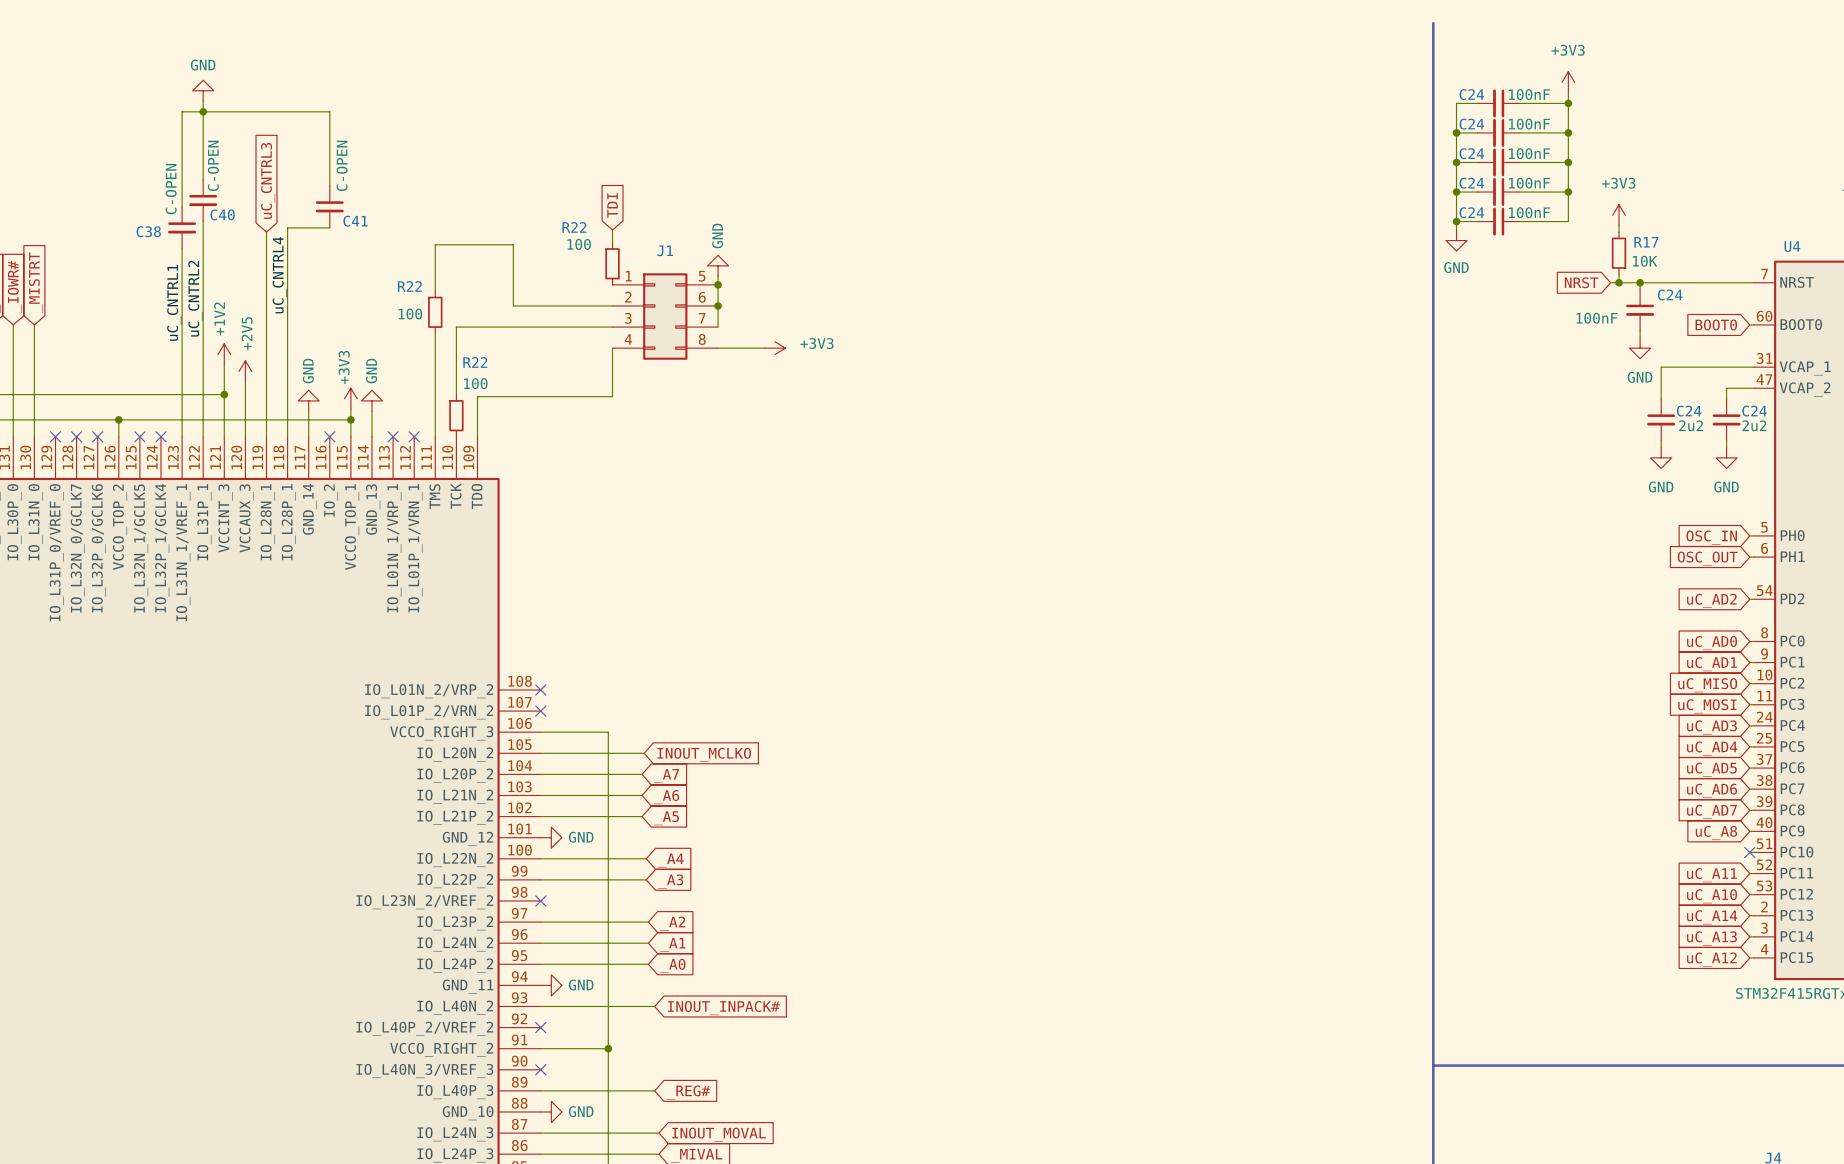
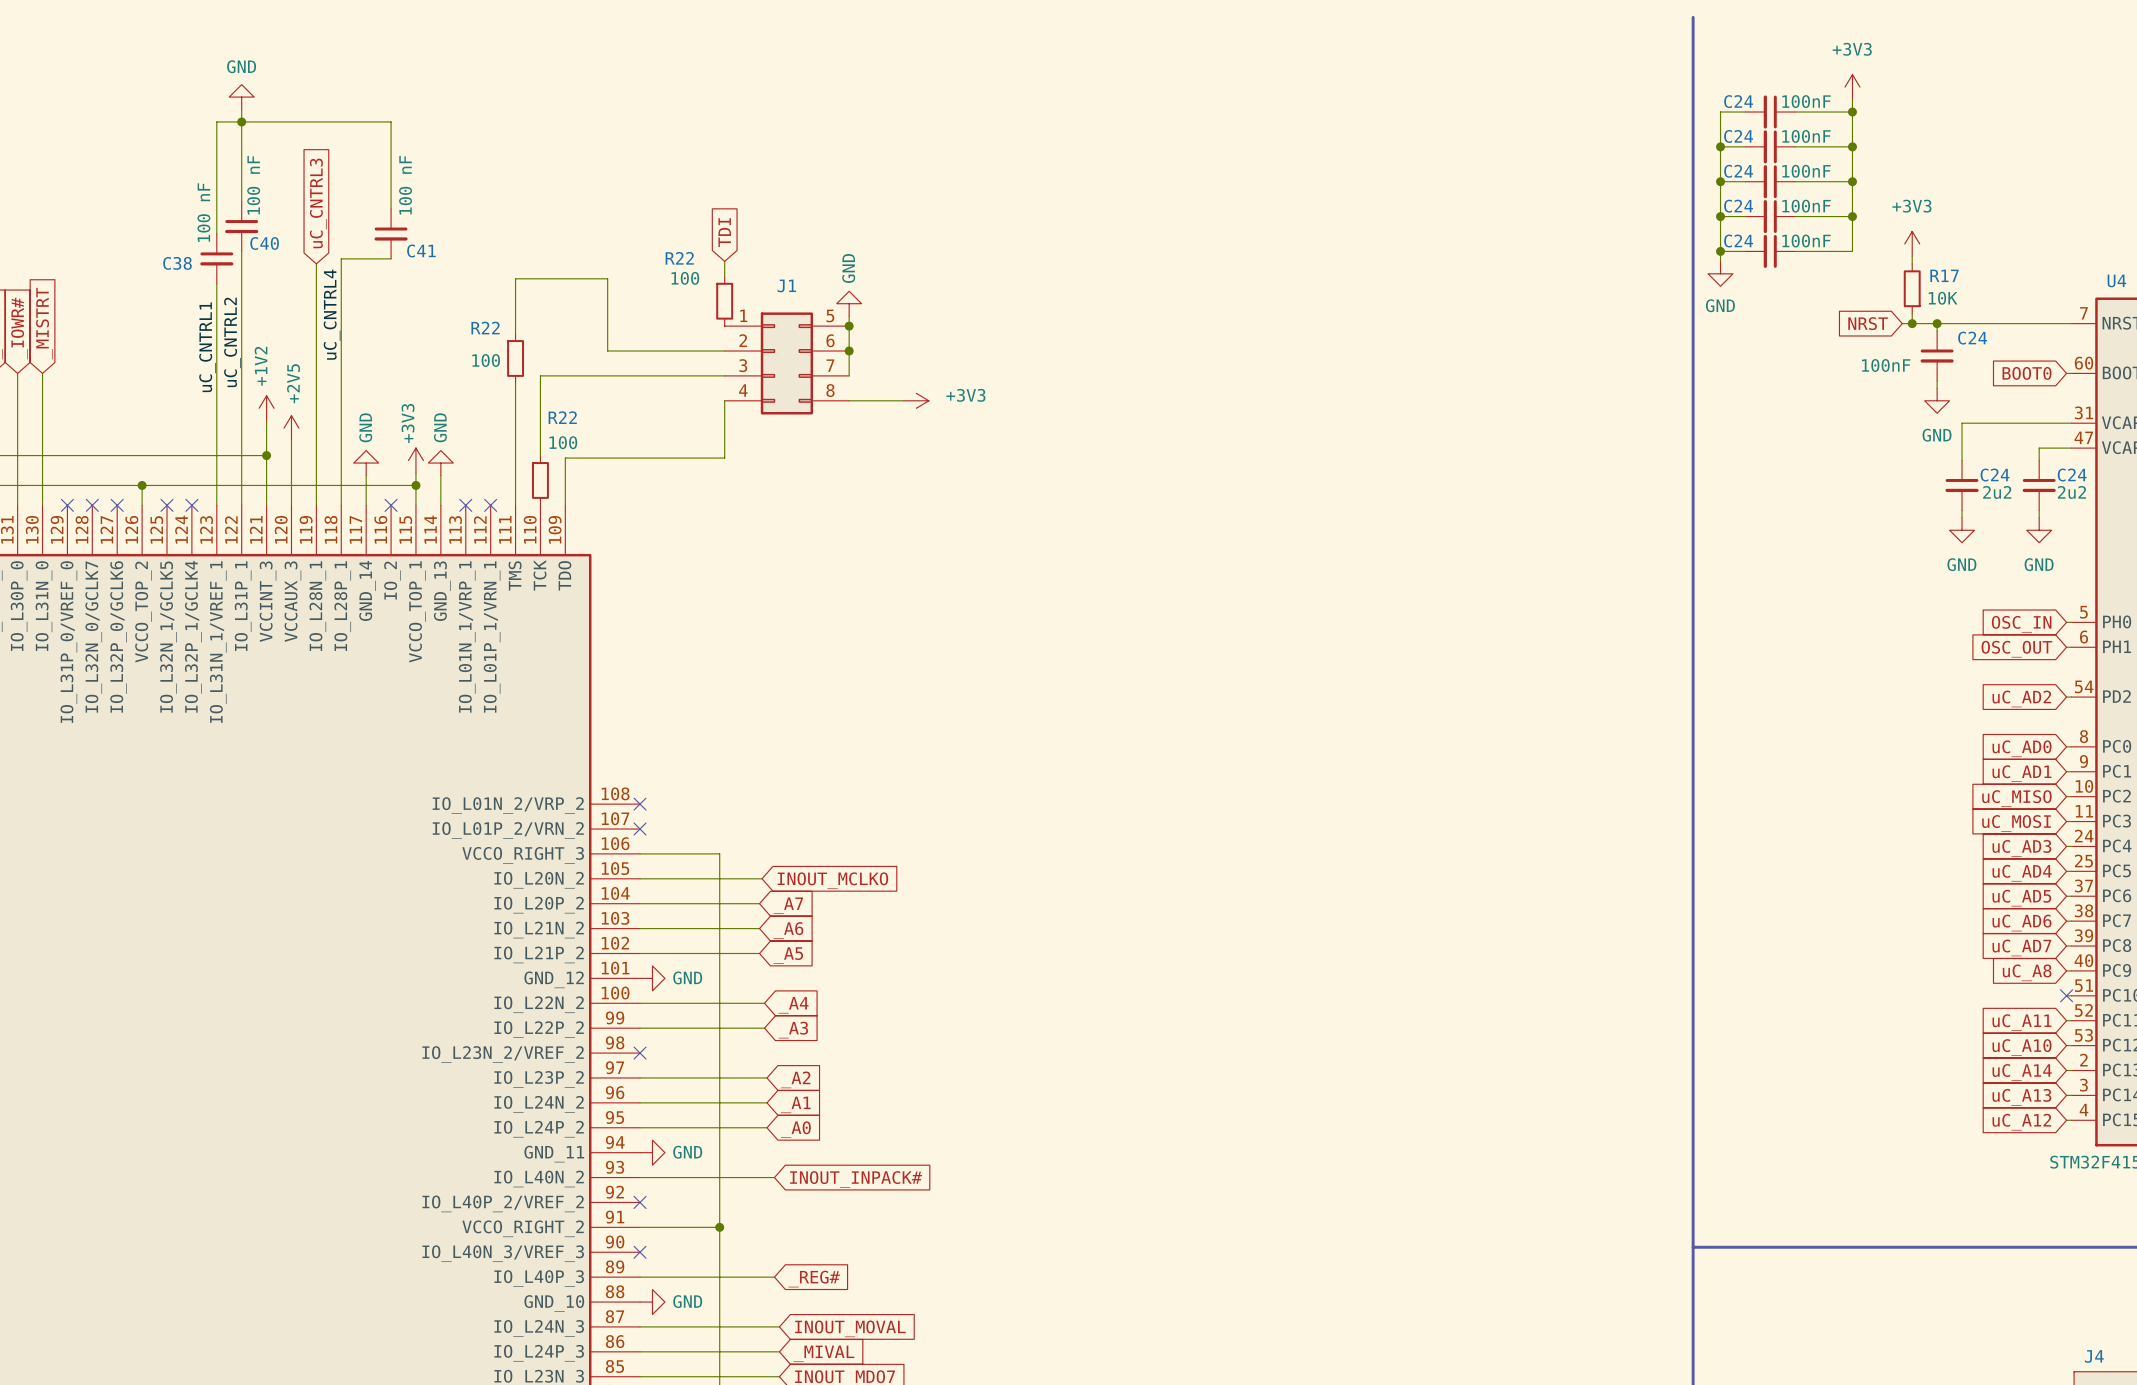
C40 value: C-OPEN (213, 165) -> 100 nF (253, 185)
C41 value: C-OPEN (342, 165) -> 100 nF (405, 185)
C38 value: C-OPEN (171, 189) -> 100 nF (203, 212)

